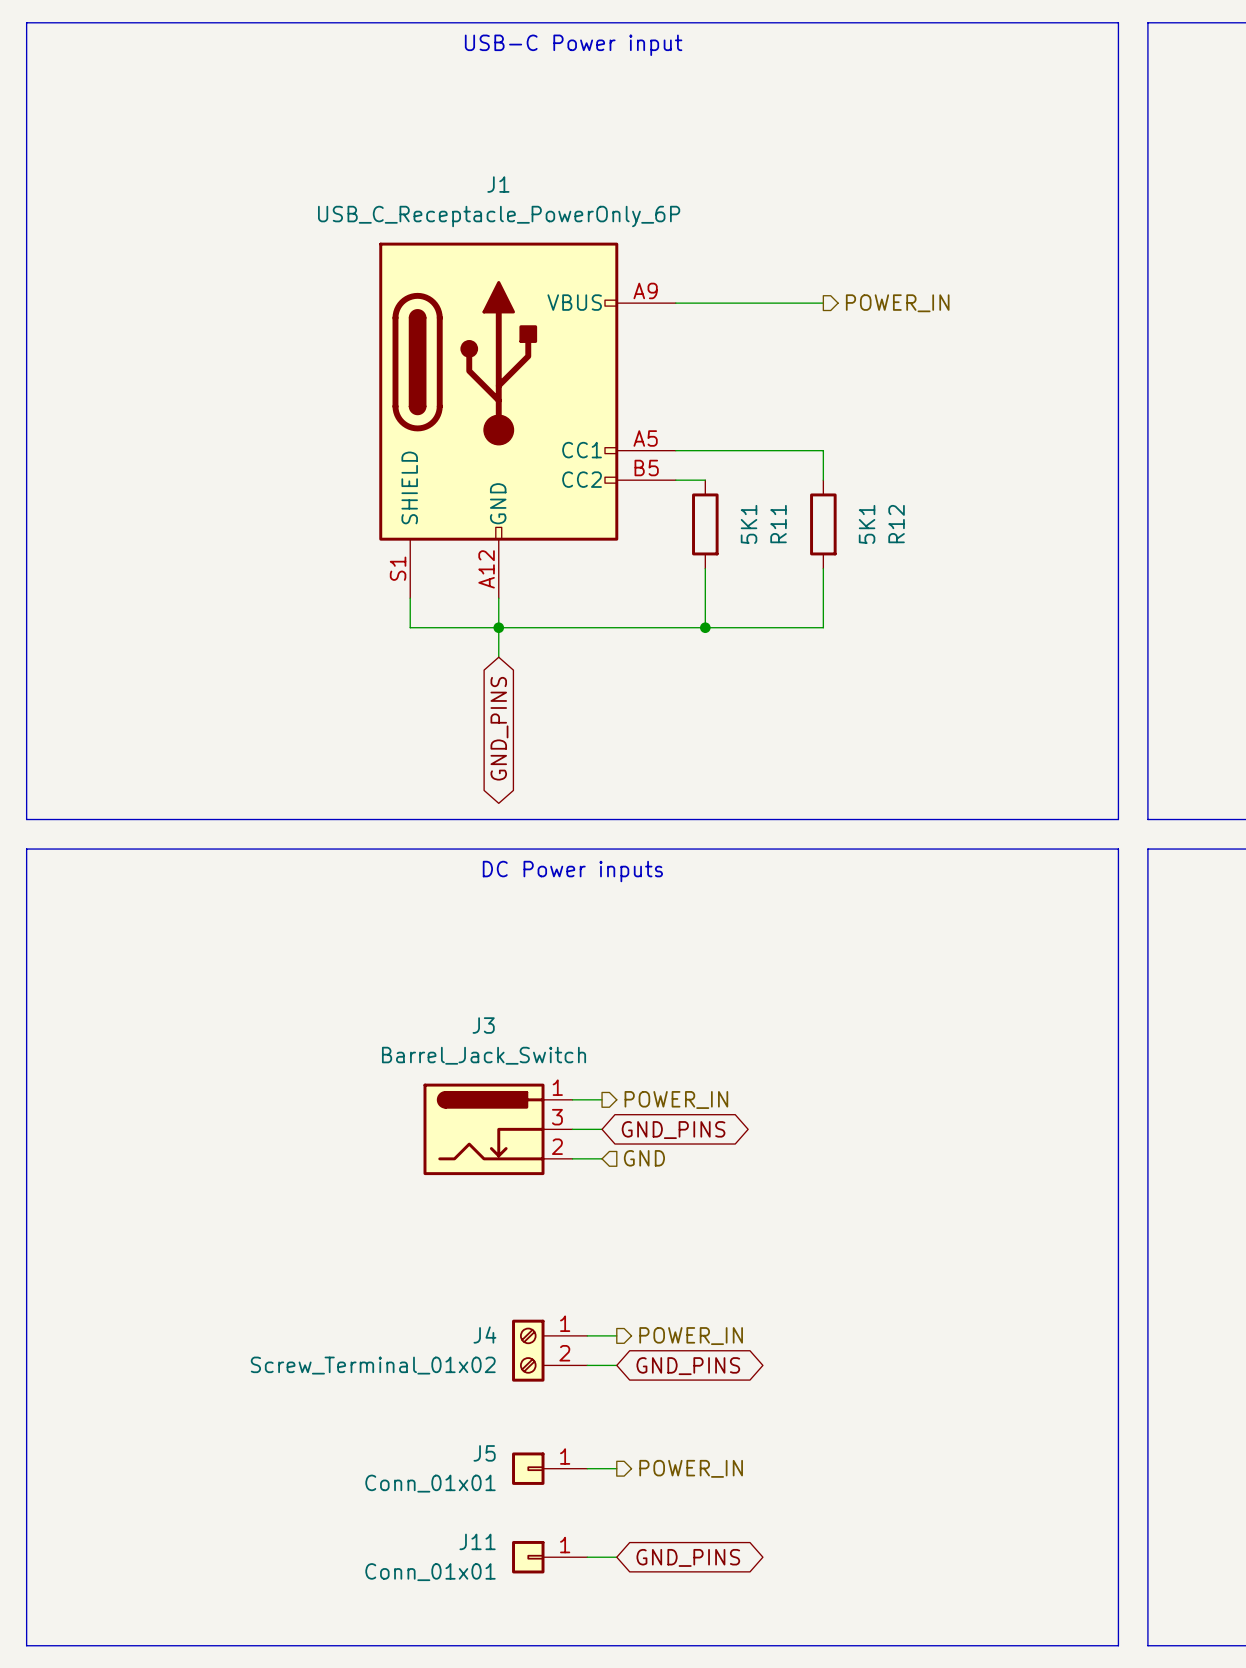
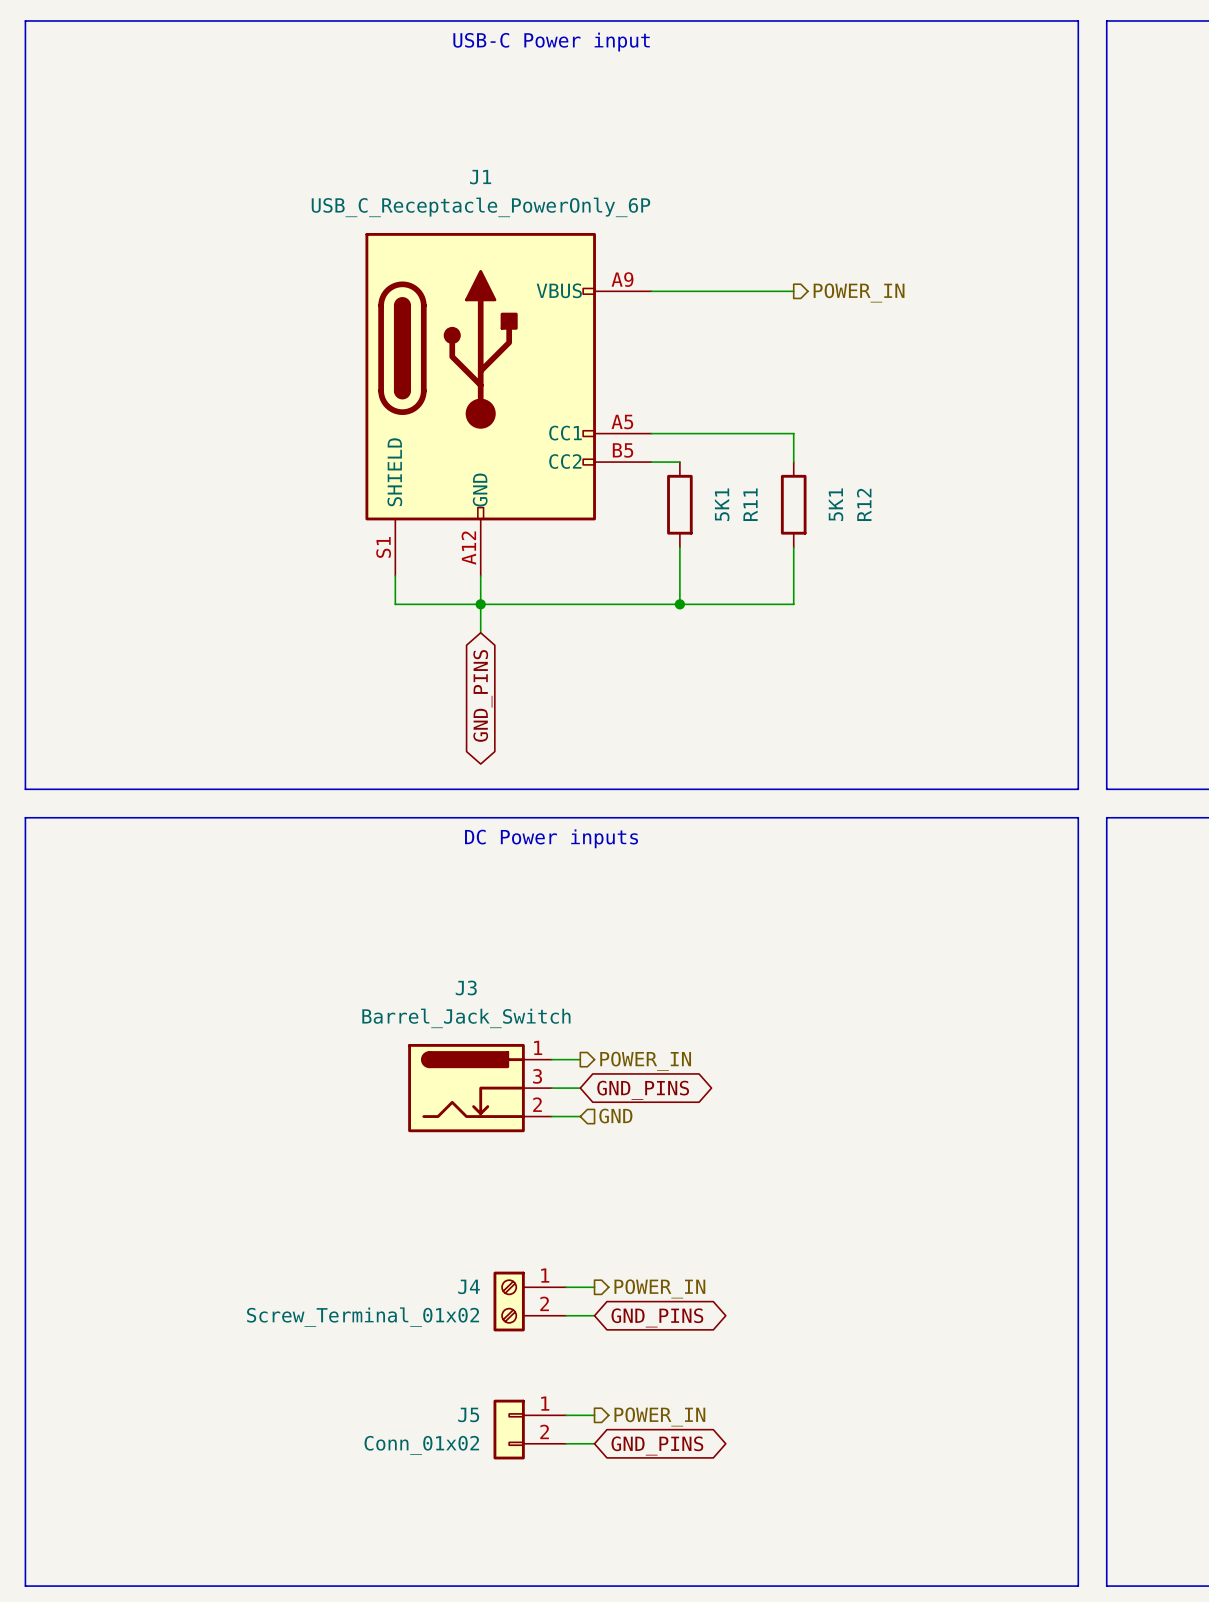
J5 symbol: [512, 1452, 588, 1485] -> [493, 1399, 567, 1460]
J5 value: Conn_01x01 (430, 1483) -> Conn_01x02 (421, 1445)
J11: Conn_01x01 (549, 1557) -> none
wire: (587, 1557) (616, 1557) -> (566, 1443) (594, 1443)
global label position: GND_PINS (688, 1557) -> GND_PINS (657, 1445)

